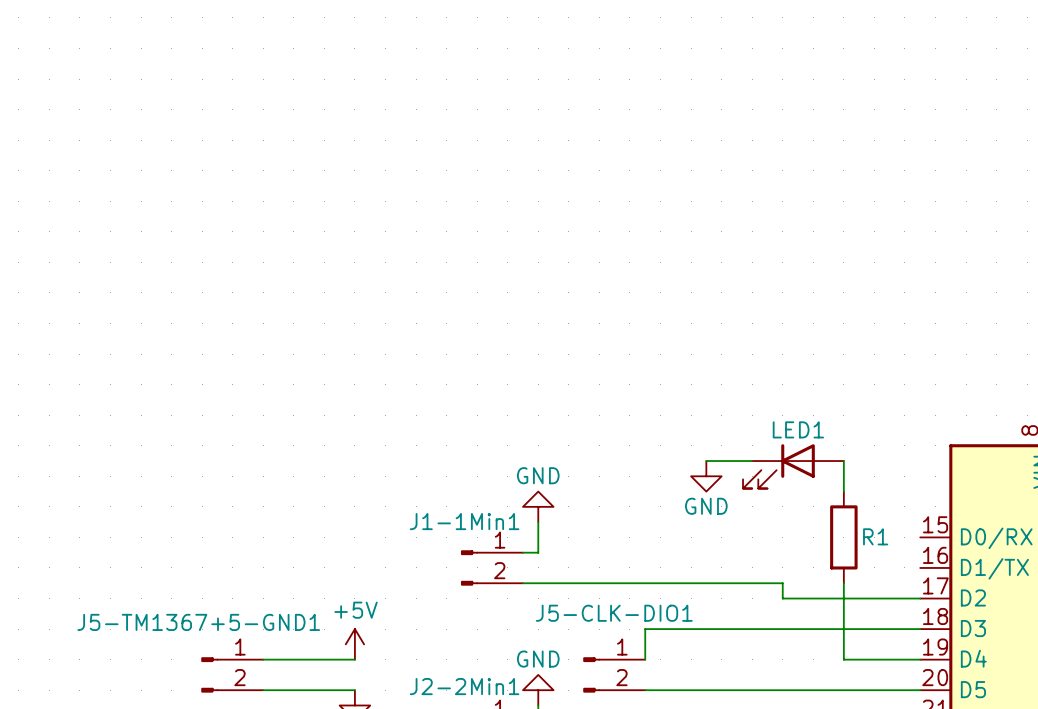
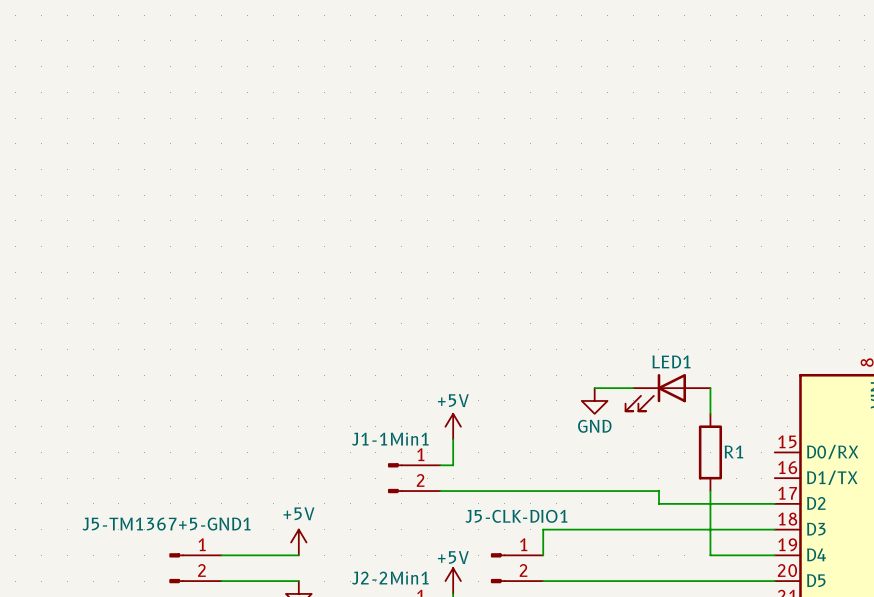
power symbol: GND (538, 506) -> +5V (453, 426)
power symbol: GND (538, 690) -> +5V (453, 581)

